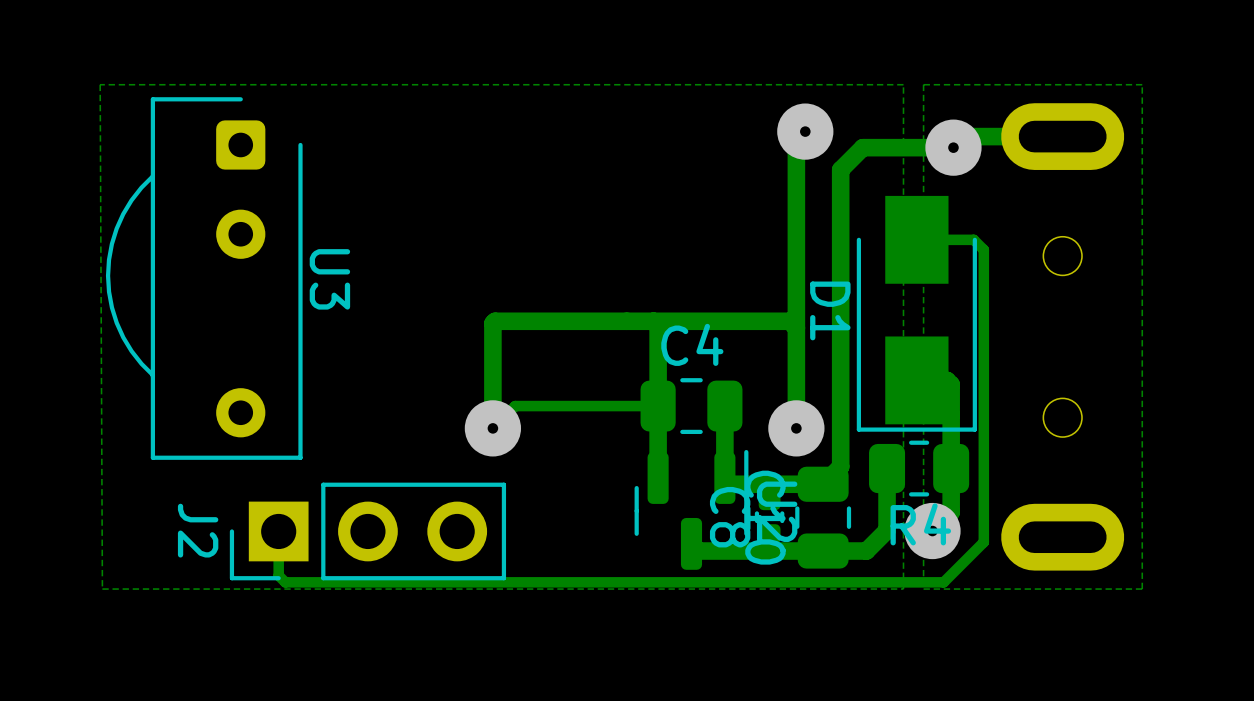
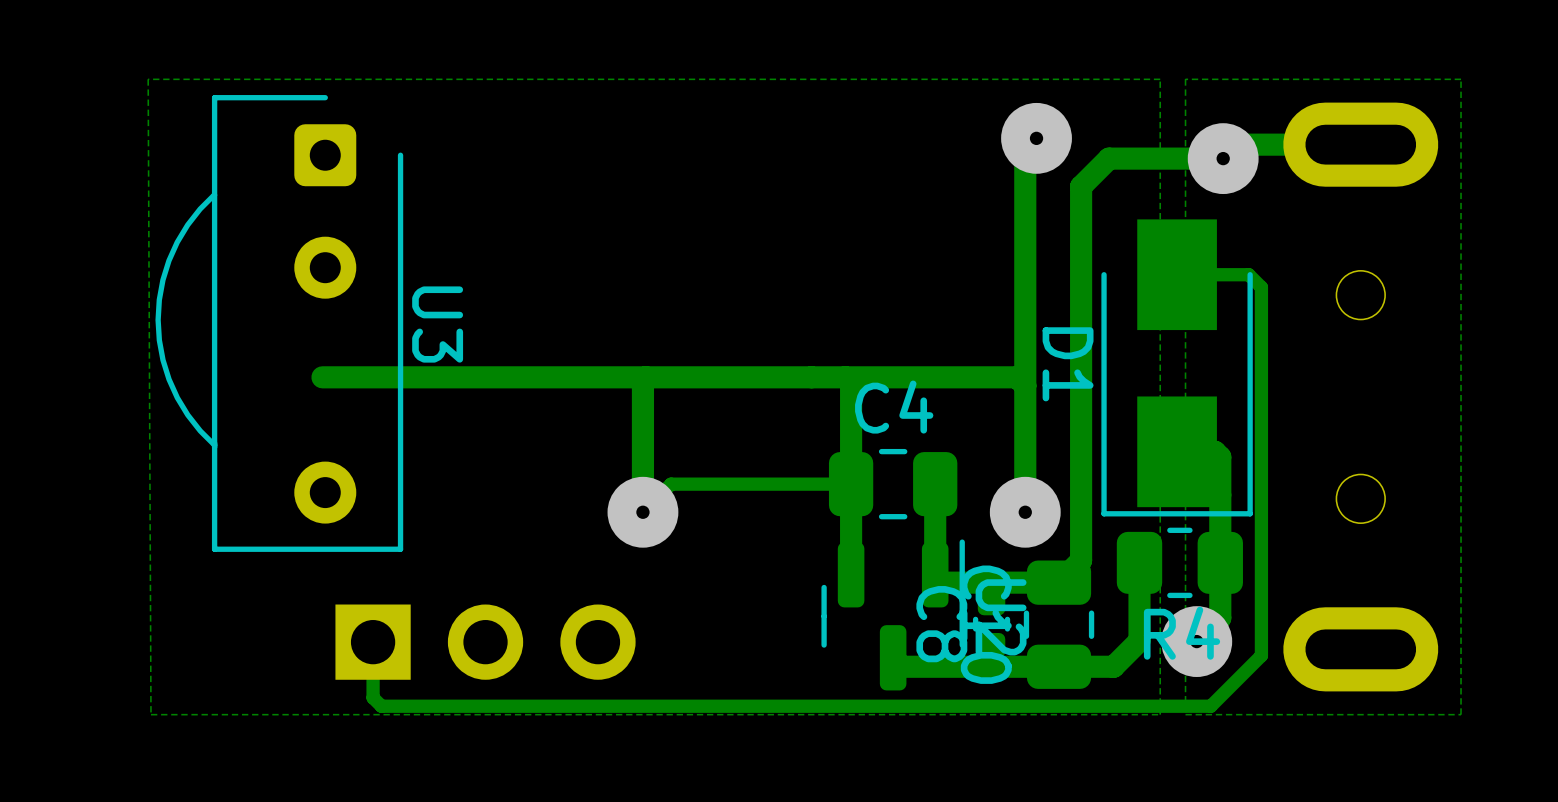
track: none -> (645, 377) (322, 377)
J2 side: bottom (367, 531) -> top (485, 642)

